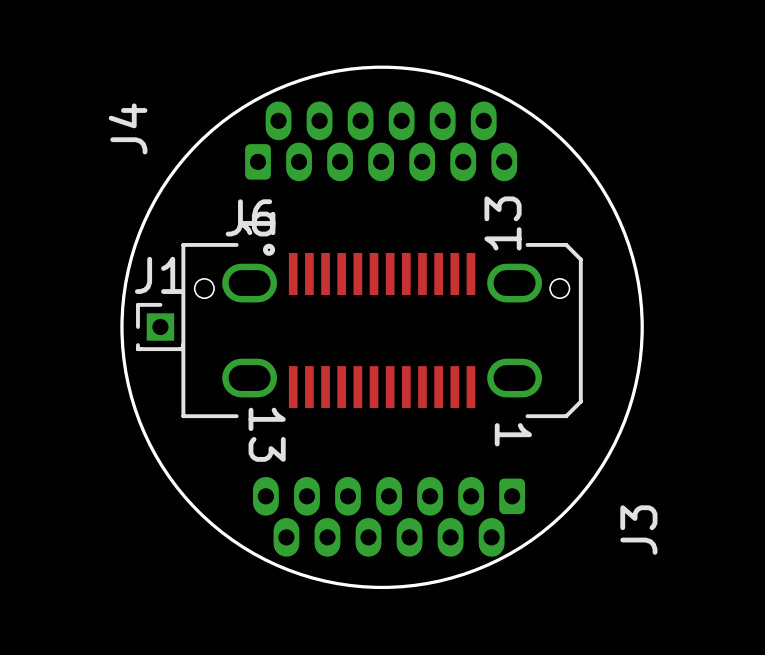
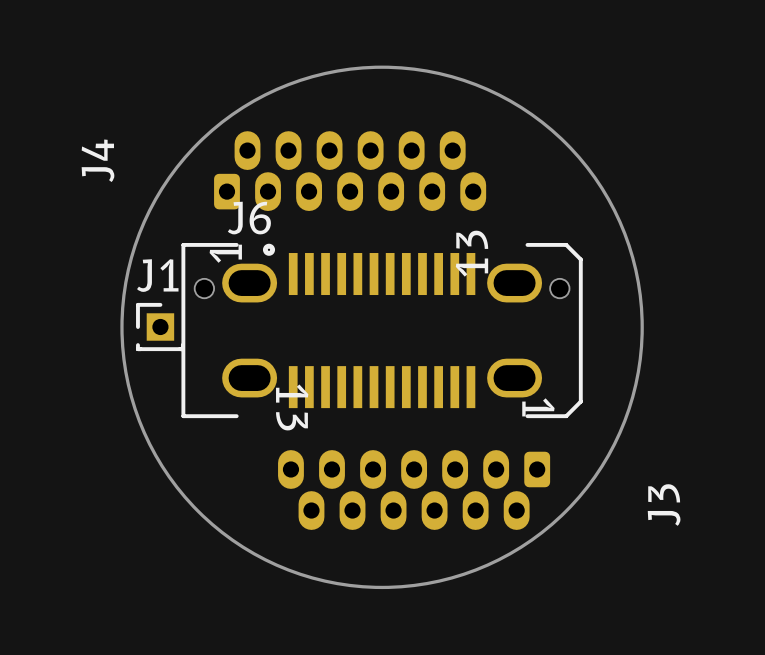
J4 position: (381, 141) -> (350, 171)
J3 position: (389, 516) -> (414, 490)

